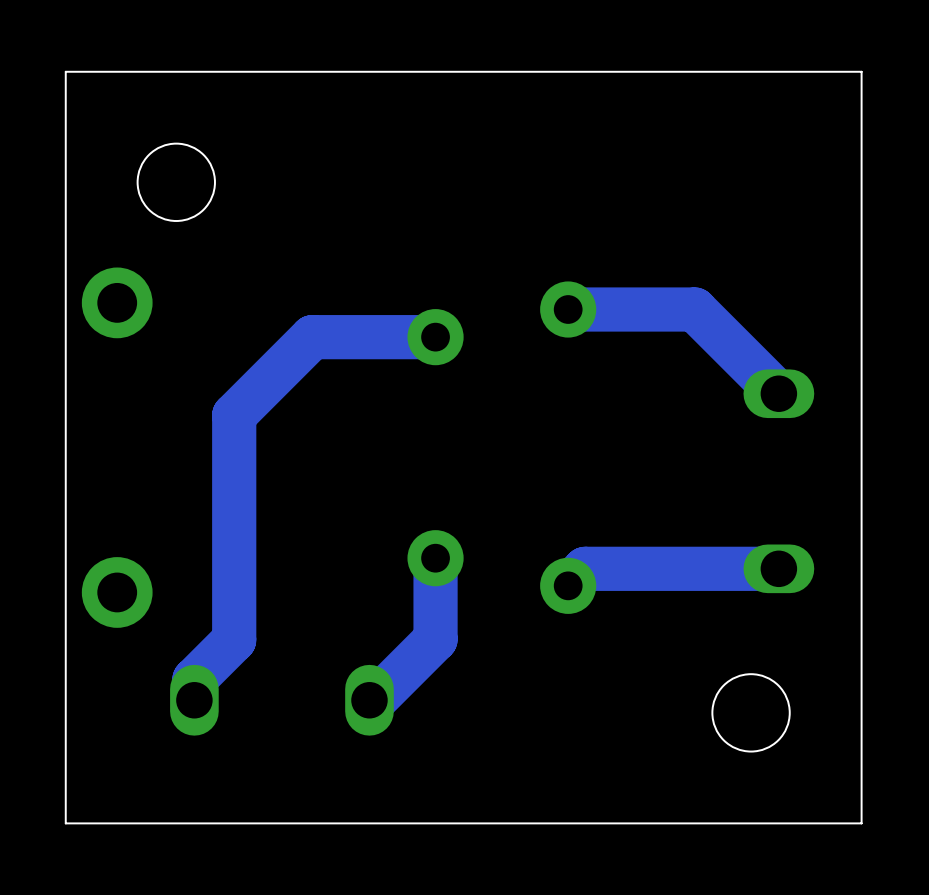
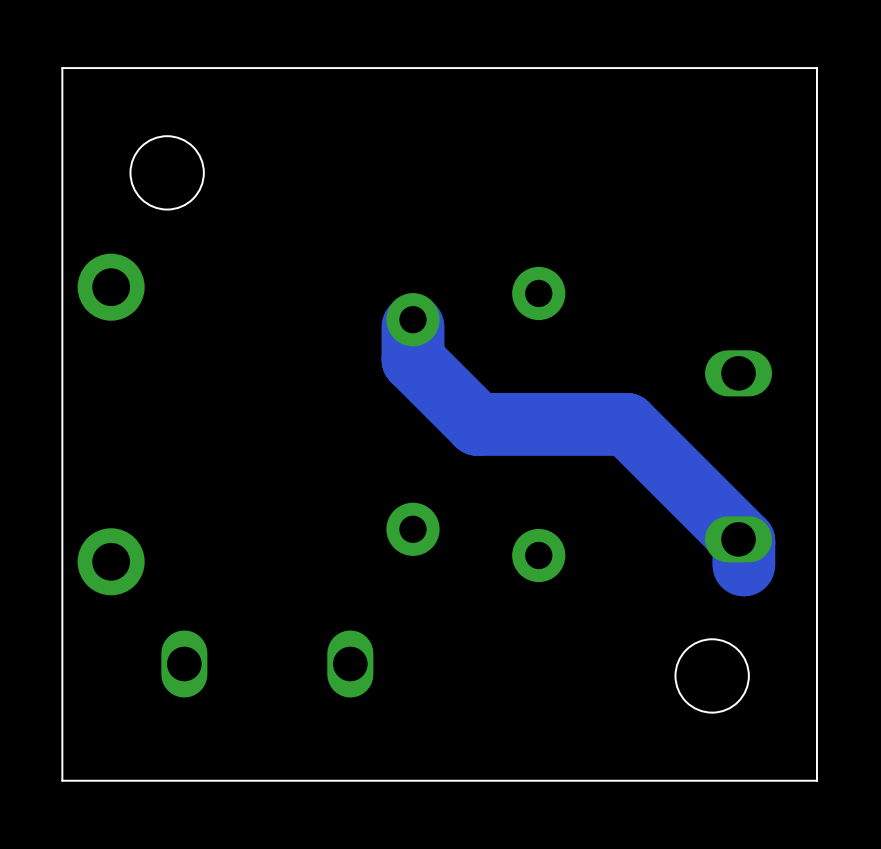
track: (568, 309) (694, 309) (778, 393) -> none
track: (435, 337) (312, 337) (234, 415) (234, 639) (194, 679) (194, 700) -> none
track: none -> (412, 326) (412, 359) (477, 424) (626, 424) (743, 541) (743, 565)
track: (435, 558) (435, 639) (374, 700) -> none
track: (778, 568) (585, 568) (568, 585) -> none

